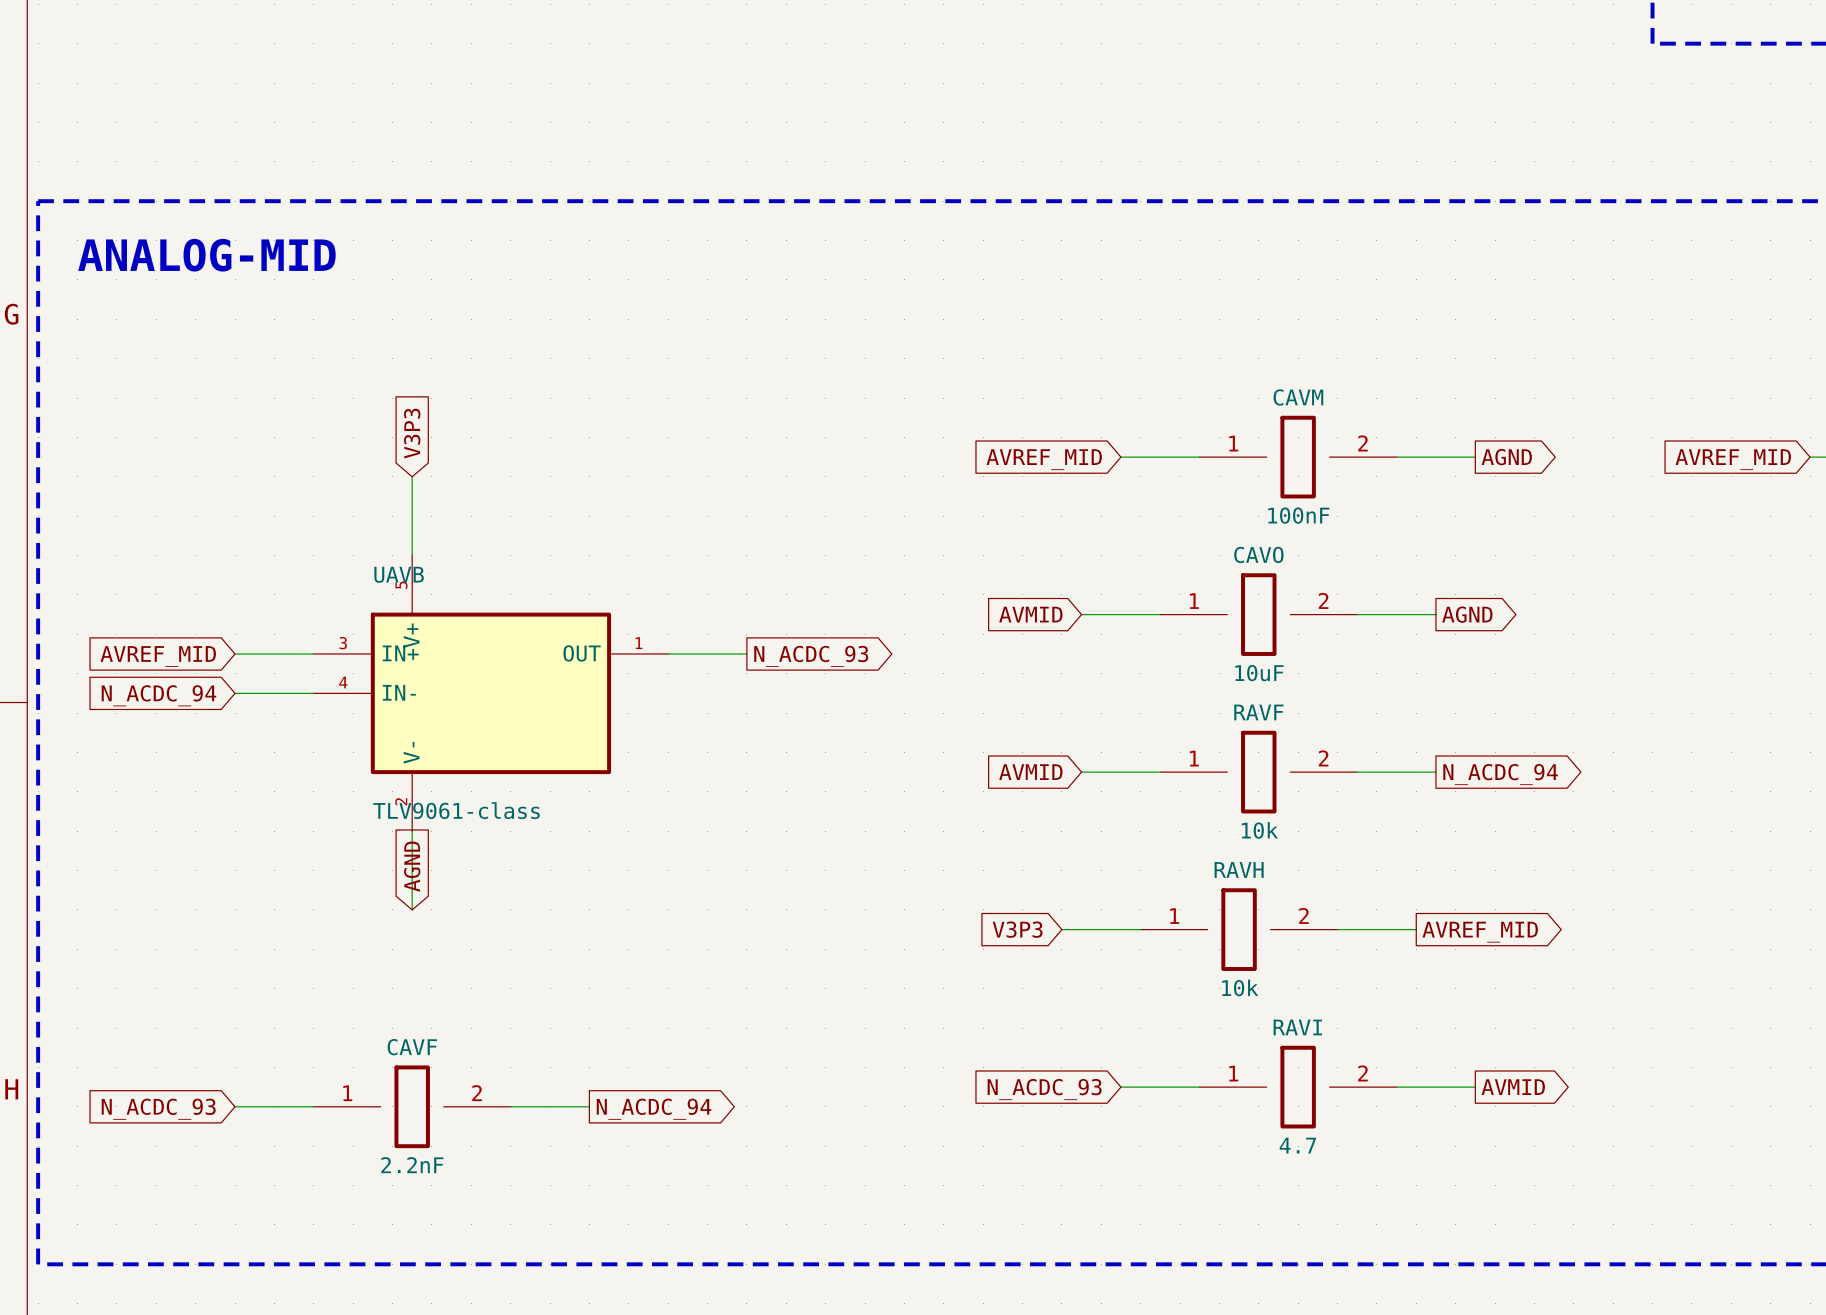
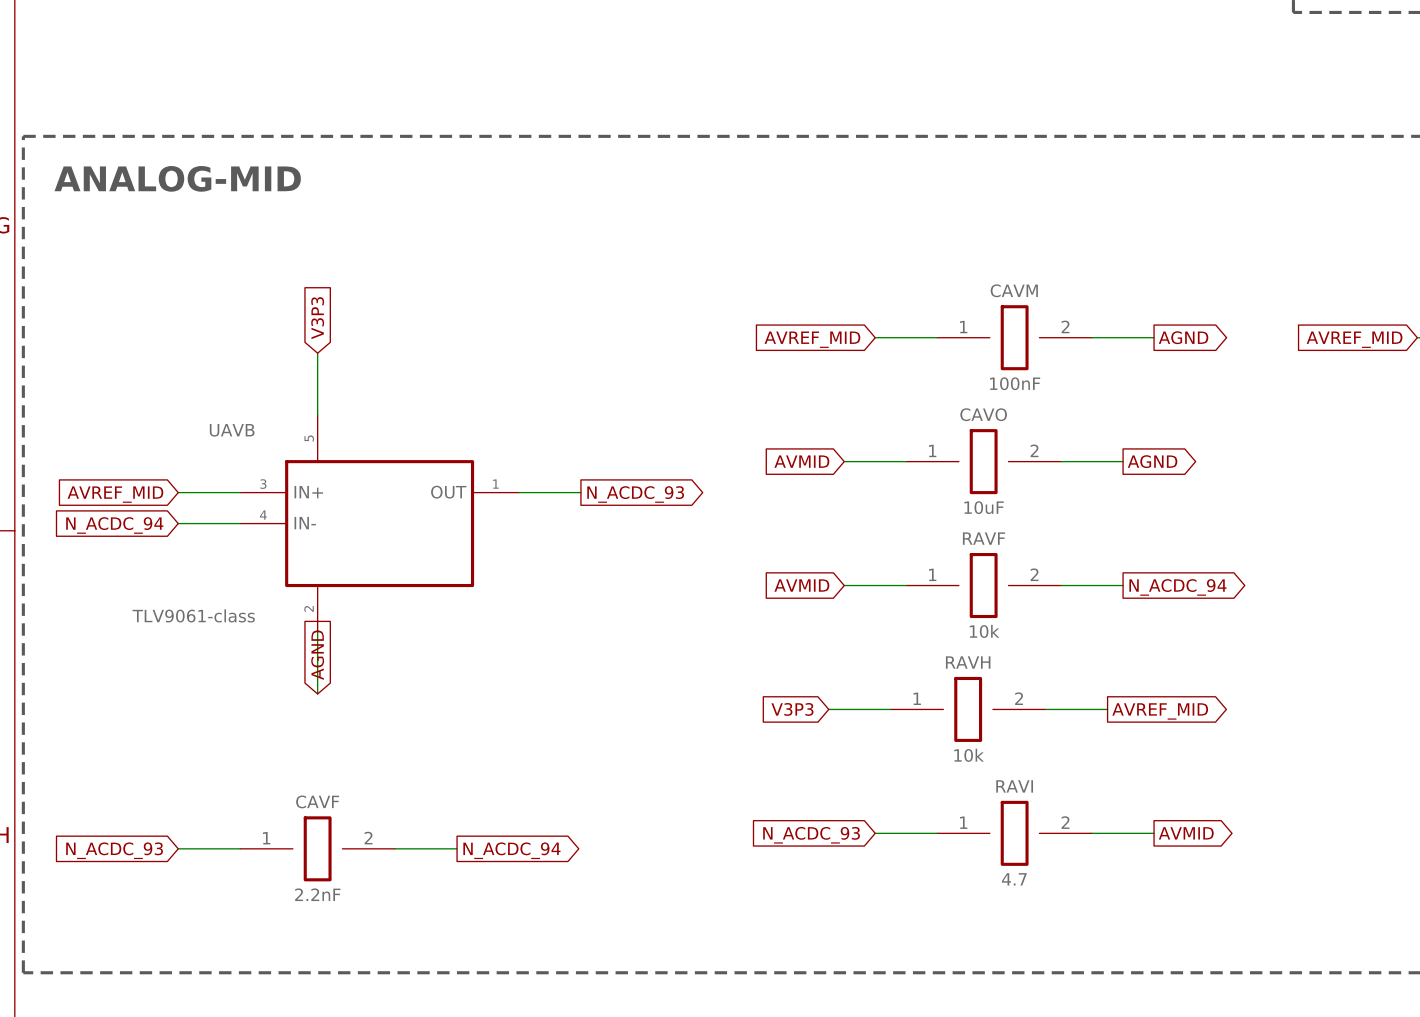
UAVB name position: UAVB (399, 574) -> UAVB (232, 430)
UAVB pin name: V+ (411, 635) -> none
UAVB pin name: V- (411, 752) -> none
UAVB value position: TLV9061-class (456, 810) -> TLV9061-class (193, 615)

